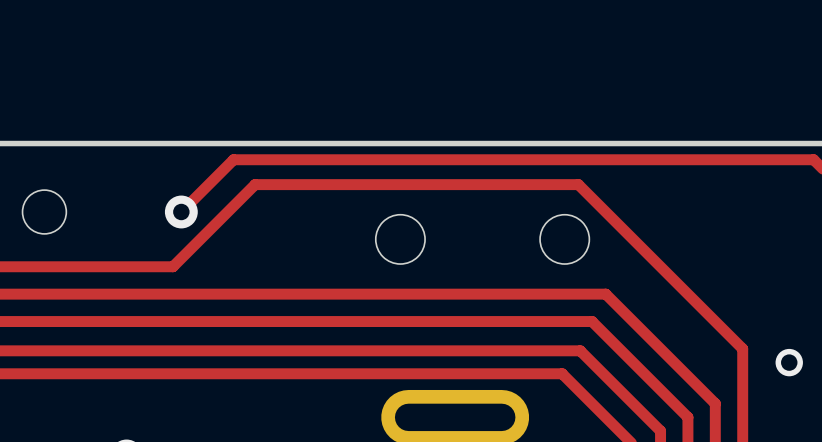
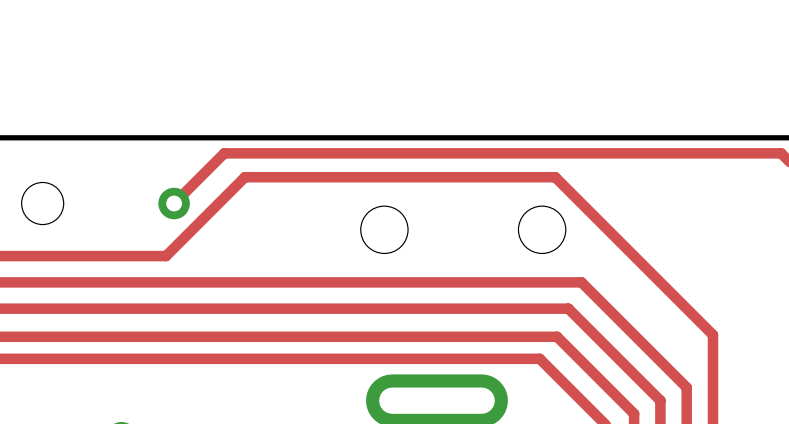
via: (789, 362) -> none

